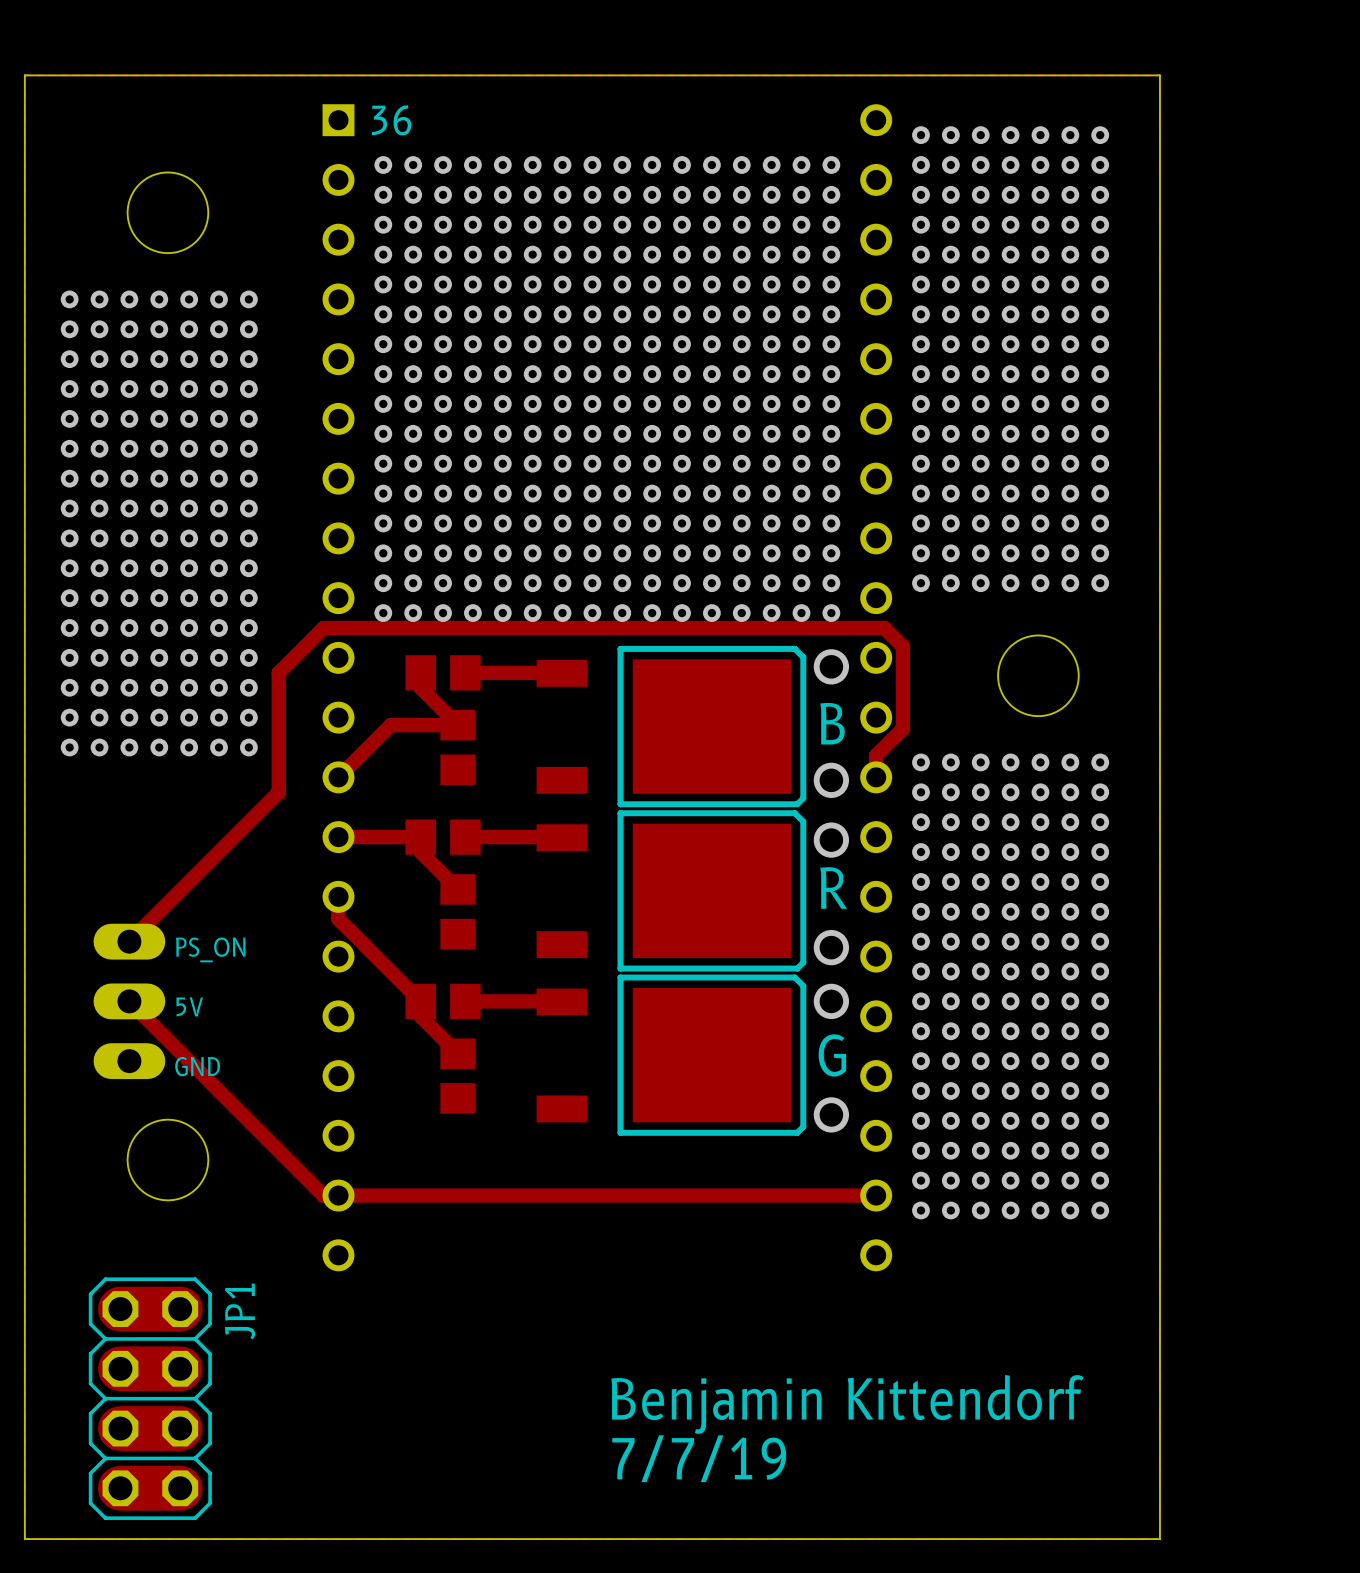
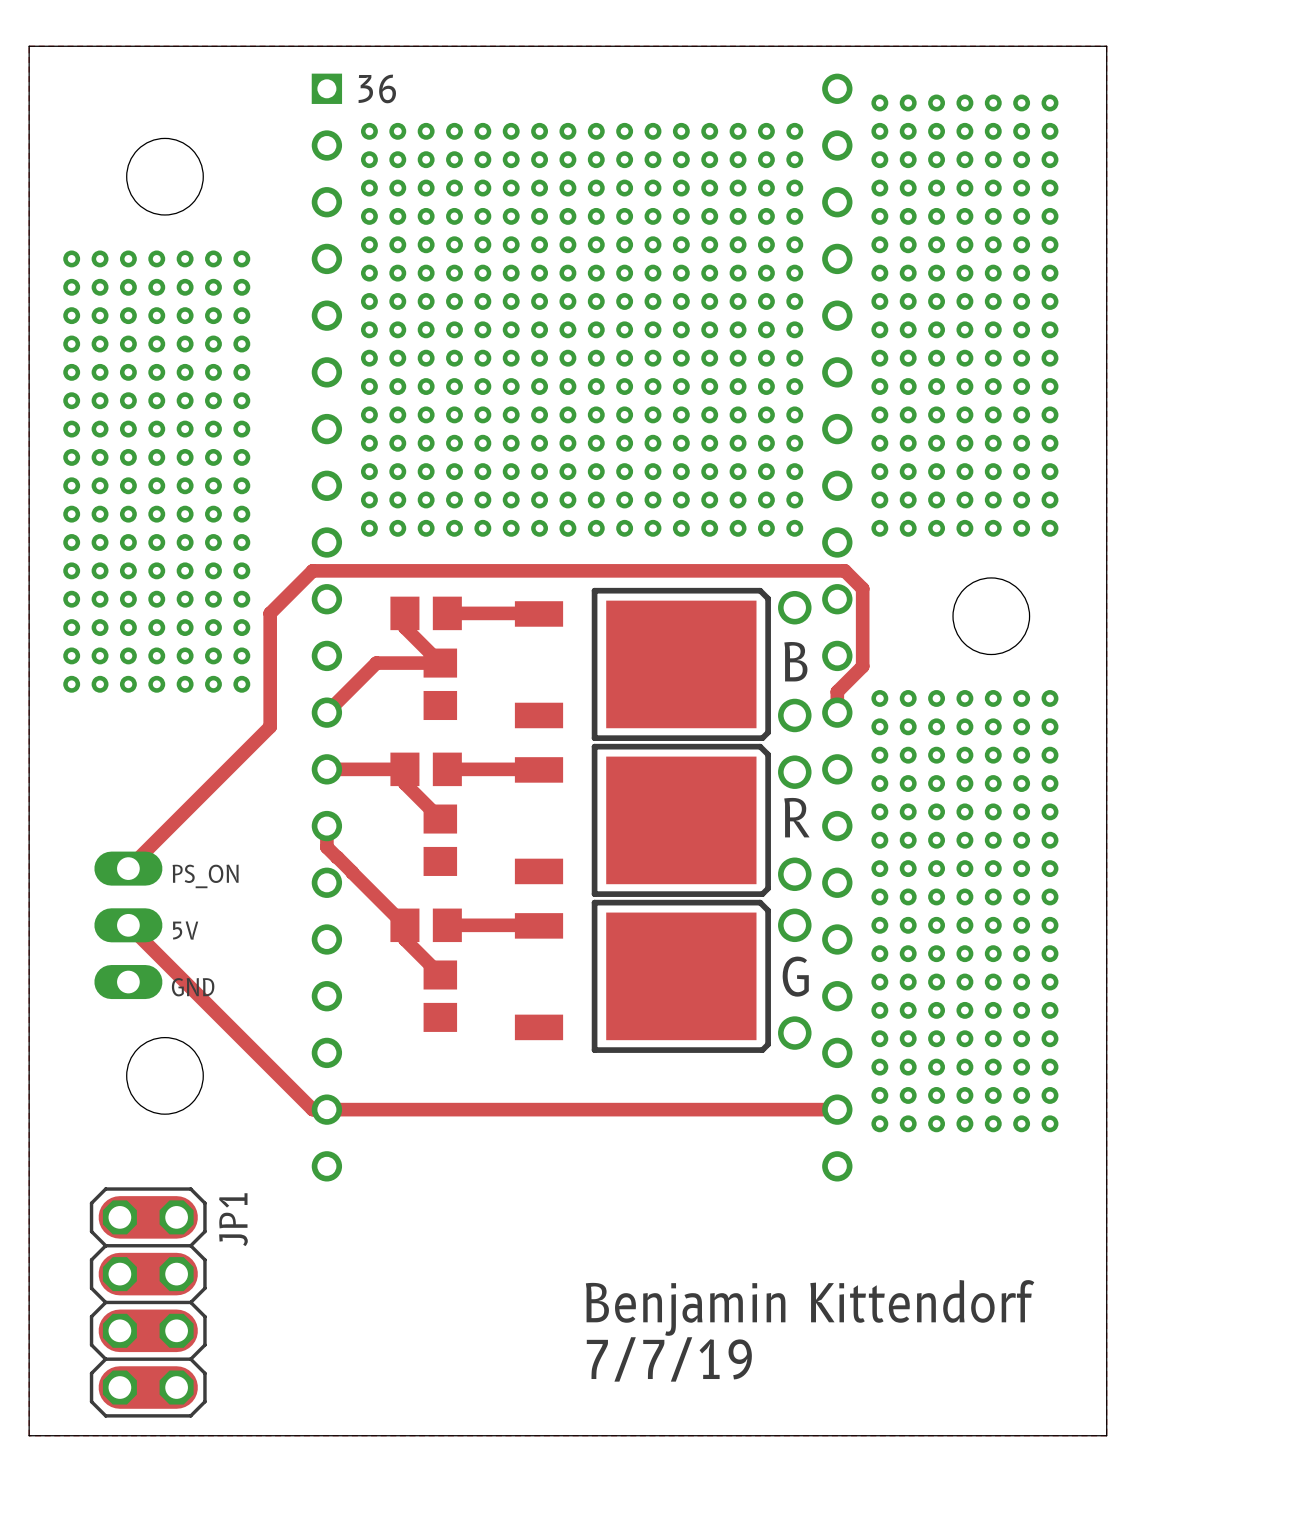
via: (383, 613) -> none
via: (413, 613) -> none
via: (443, 613) -> none
via: (472, 613) -> none
via: (502, 613) -> none
via: (532, 613) -> none
via: (562, 613) -> none
via: (592, 613) -> none
via: (622, 613) -> none
via: (652, 613) -> none
via: (682, 613) -> none
via: (711, 613) -> none
via: (741, 613) -> none
via: (771, 613) -> none
via: (801, 613) -> none
via: (831, 613) -> none

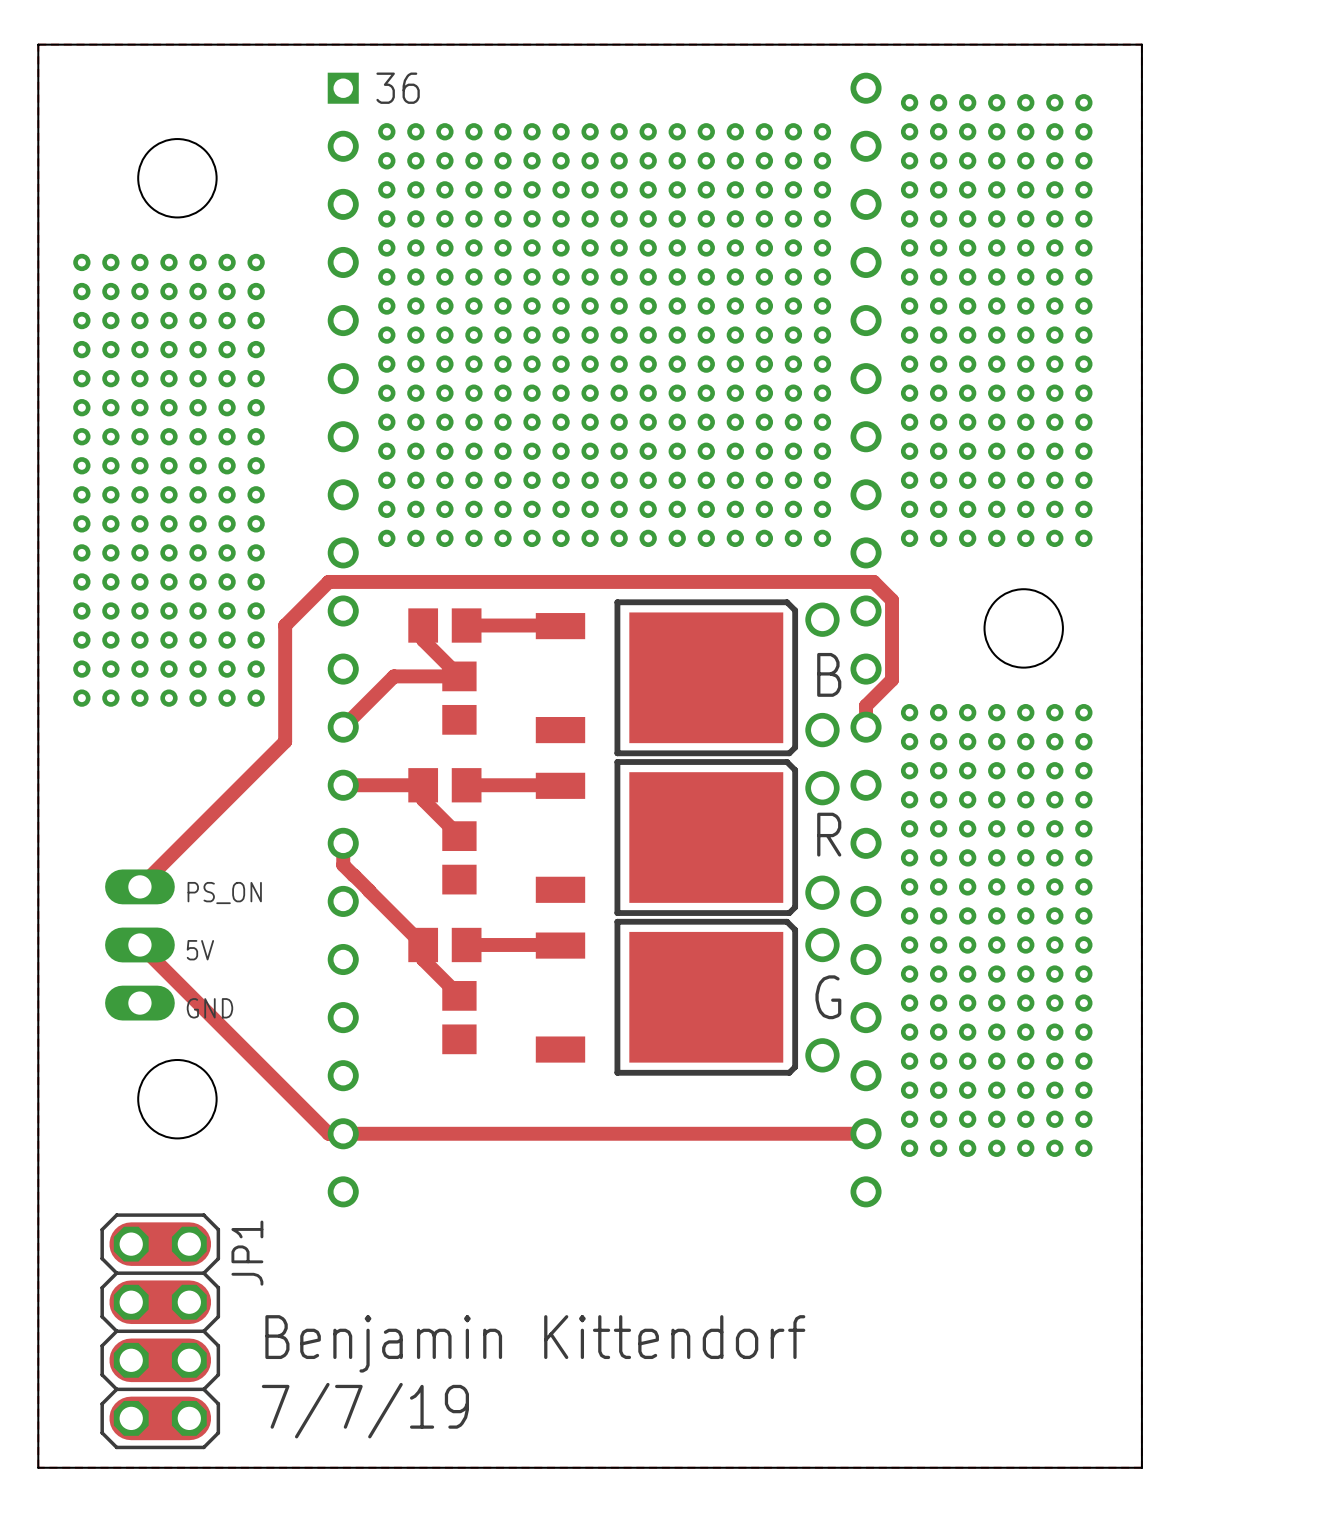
text position: Benjamin Kittendorf (810, 1307) -> Benjamin Kittendorf (535, 1343)
text position: 7/7/19 (669, 1359) -> 7/7/19 (365, 1410)

